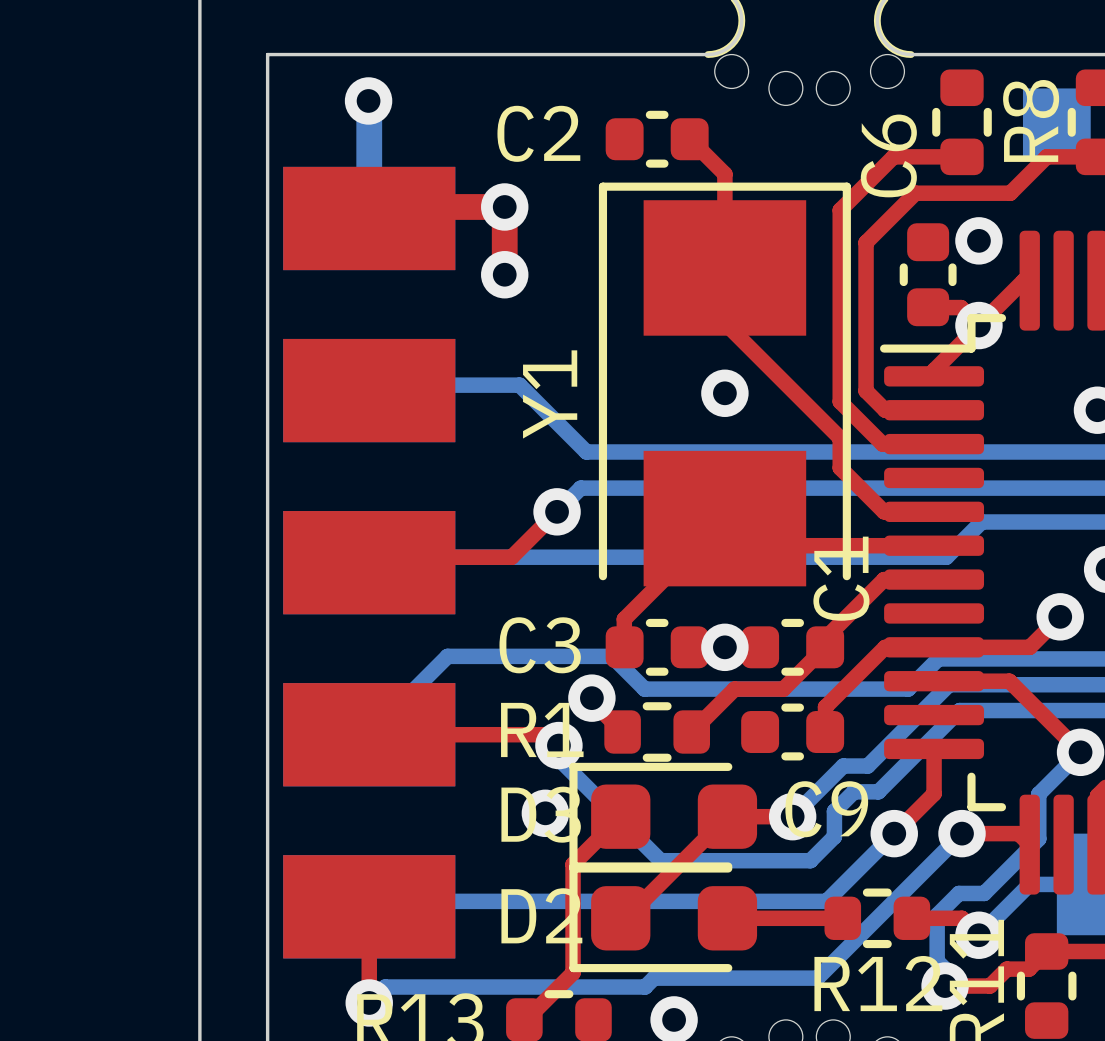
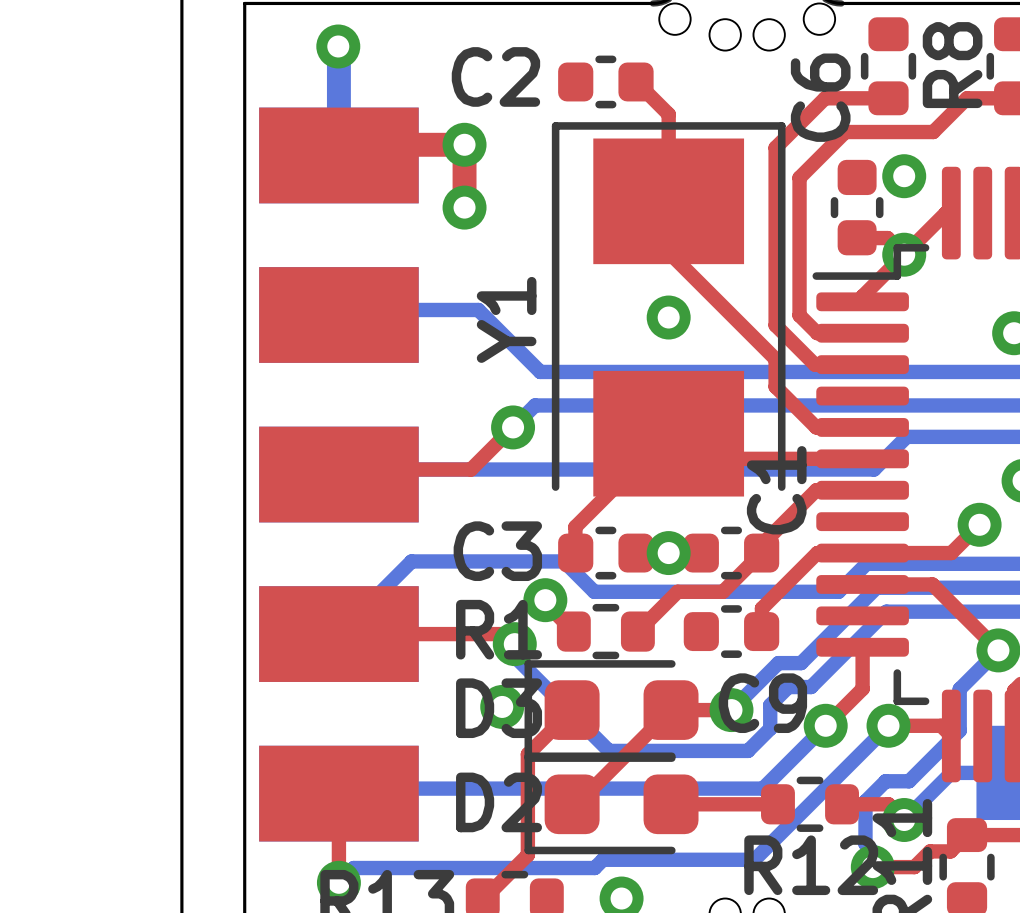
part: (1056, 122) -> none

